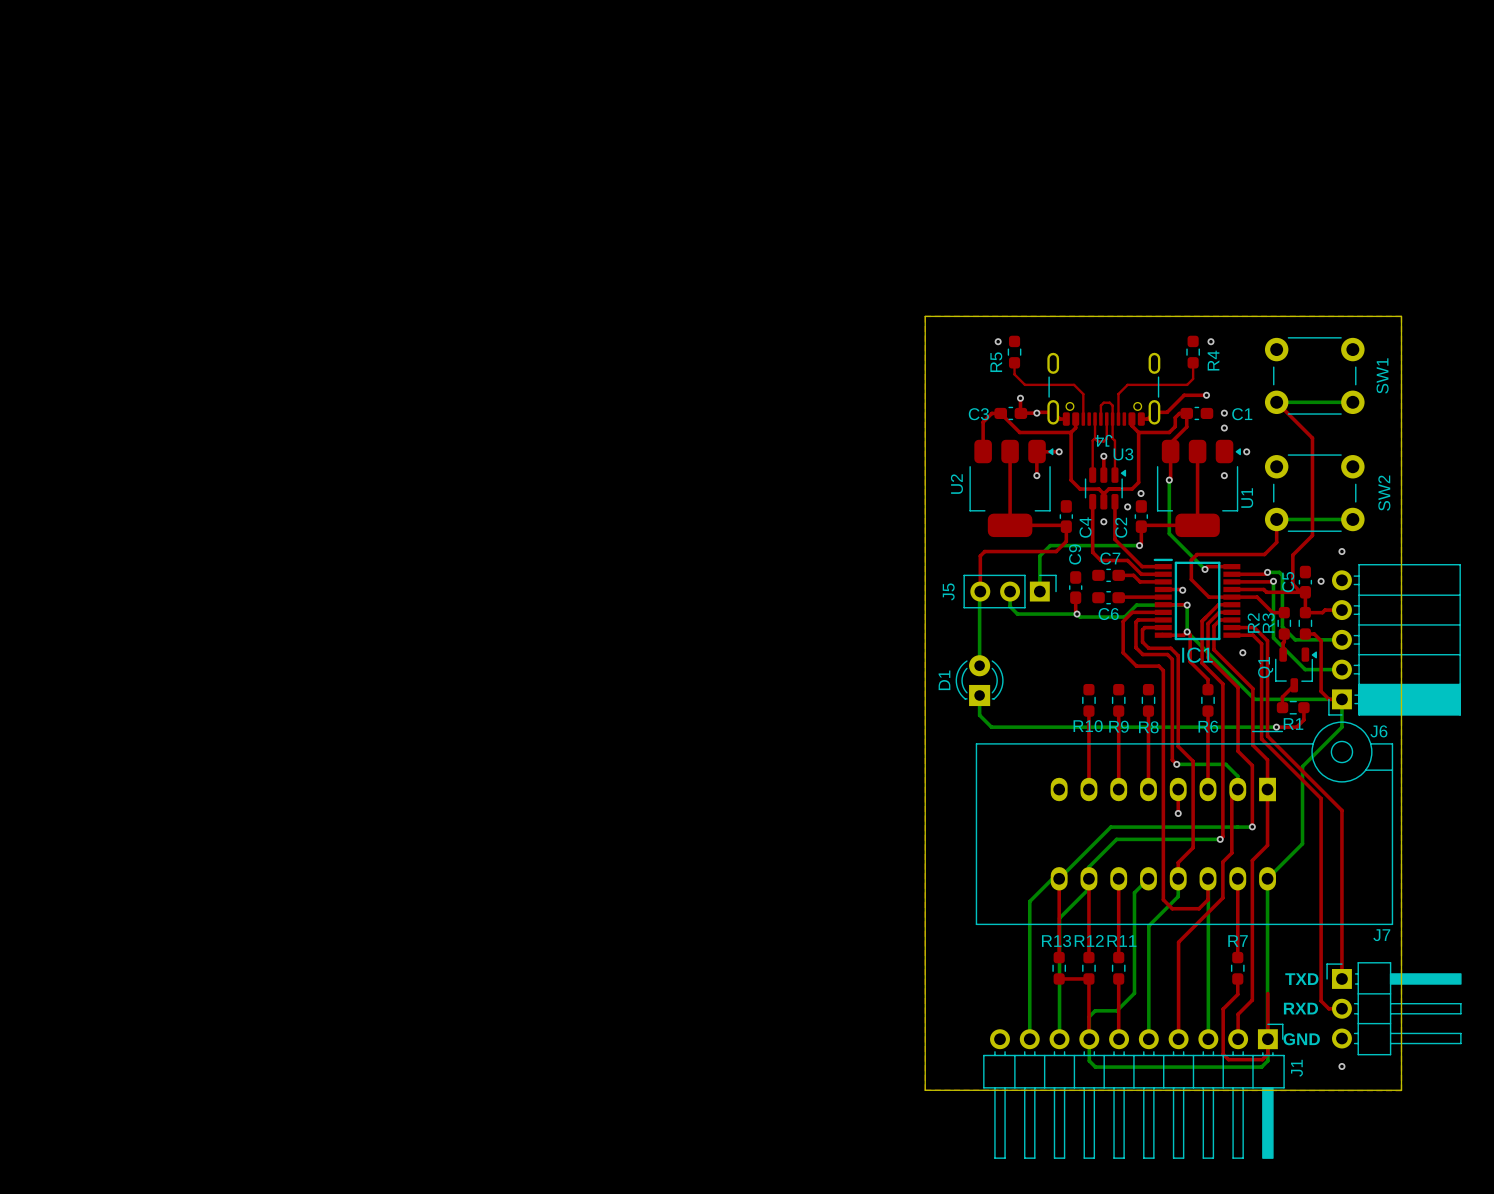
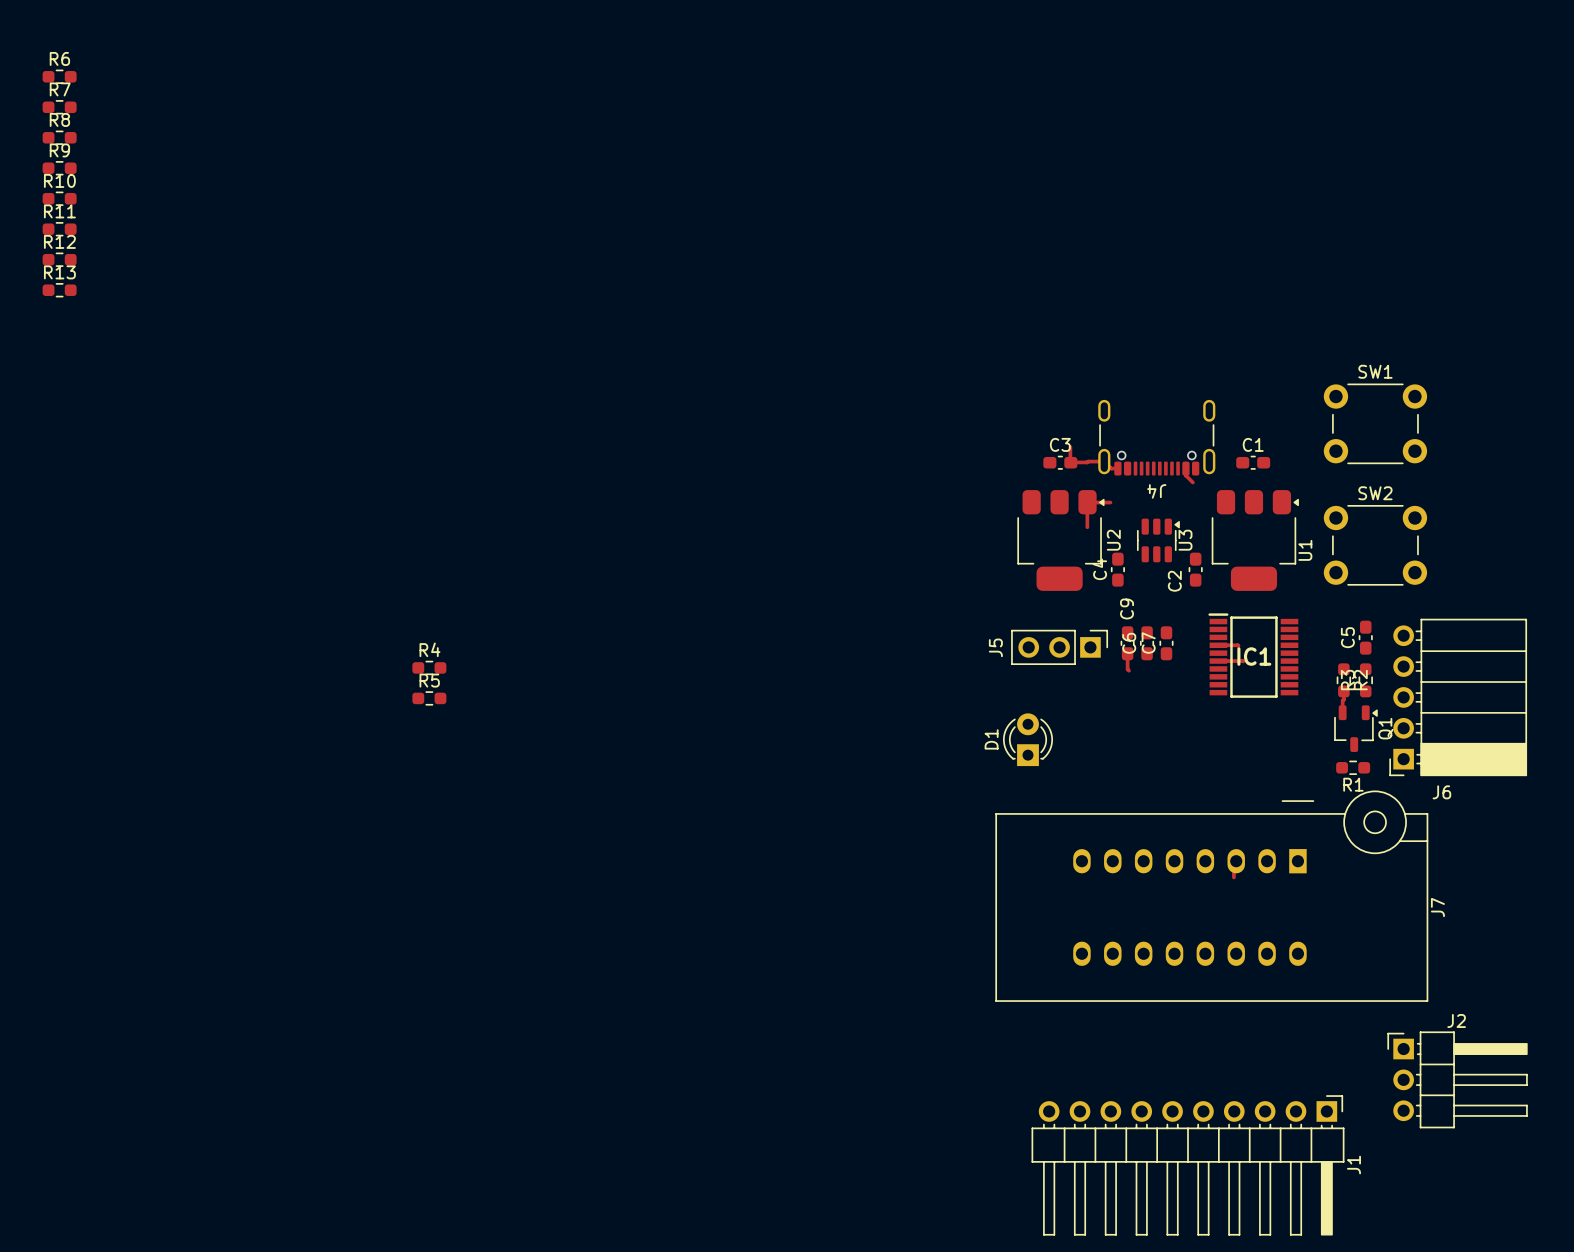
board edge: (925, 316) (1401, 316) (1401, 1090) (925, 1090) (925, 316) -> none
via: (998, 341) -> none
via: (1210, 341) -> none
R5 rotation: 0° (1014, 352) -> 90° clockwise (429, 698)
R5 position: (1014, 352) -> (429, 698)
R4 rotation: 0° (1193, 352) -> 90° clockwise (429, 667)
R4 position: (1193, 352) -> (429, 667)
R4 name position: R4 (1213, 360) -> R4 (429, 649)
top track: (1014, 362) (1014, 374) (1024, 384) (1074, 384) (1083, 394) (1083, 419) -> none
top track: (1193, 362) (1193, 378) (1187, 384) (1127, 384) (1118, 394) (1118, 419) -> none
SW1 name rotation: 0° (1382, 375) -> 90° clockwise (1375, 371)
SW1 name position: SW1 (1382, 375) -> SW1 (1375, 371)
top track: (1206, 395) (1184, 395) (1167, 412) (1154, 412) (1147, 419) (1141, 419) -> none
via: (1206, 395) -> none
via: (1020, 398) -> none
top track: (1276, 402) (1312, 438) (1312, 535) (1292, 555) (1292, 584) (1300, 592) -> none
bottom track: (1276, 402) (1352, 402) -> none
via: (1036, 413) -> none
via: (1224, 413) -> none
C3 name position: C3 (978, 414) -> C3 (1060, 444)
C1 name position: C1 (1242, 414) -> C1 (1253, 444)
top track: (1075, 419) (1075, 427) (1071, 432) -> none
top track: (1095, 419) (1095, 438) (1097, 441) (1103, 441) (1106, 438) (1106, 419) -> none
top track: (1100, 419) (1100, 405) (1103, 402) (1109, 402) (1112, 405) (1114, 475) -> none
via: (1224, 428) -> none
top track: (1071, 432) (1071, 480) (1080, 489) (1098, 489) (1103, 494) (1108, 489) (1132, 489) (1138, 482) (1138, 432) (1169, 432) (1175, 426) (1175, 417) (1179, 413) (1186, 413) (1186, 426) (1170, 443) (1169, 480) -> none
top track: (1071, 432) (1019, 432) (1000, 413) (991, 413) (983, 422) (983, 451) -> none
top track: (1095, 438) (1092, 440) (1092, 475) -> none
top track: (1010, 451) (1010, 525) (1065, 525) (1066, 541) (1056, 551) (984, 551) (980, 556) (980, 591) -> none
via: (1059, 451) -> none
top track: (1197, 451) (1197, 525) (1142, 525) (1139, 545) -> none
via: (1246, 451) -> none
U3 name rotation: 0° (1123, 454) -> 90° counterclockwise (1185, 540)
U3 name position: U3 (1123, 454) -> U3 (1185, 540)
top track: (1103, 456) (1103, 475) -> none
via: (1103, 456) -> none
via: (1036, 475) -> none
via: (1224, 475) -> none
bottom track: (1169, 480) (1169, 533) (1205, 569) -> none
via: (1169, 480) -> none
U2 name position: U2 (956, 484) -> U2 (1113, 540)
via: (1141, 493) -> none
SW2 name rotation: 0° (1384, 493) -> 90° clockwise (1375, 493)
SW2 name position: SW2 (1384, 493) -> SW2 (1375, 493)
top track: (1092, 501) (1092, 552) (1100, 560) (1127, 560) (1141, 574) (1163, 574) -> none
top track: (1114, 501) (1114, 539) (1142, 566) (1163, 566) -> none
via: (1127, 506) -> none
top track: (1276, 519) (1276, 542) (1264, 554) (1196, 554) (1191, 560) (1191, 579) (1208, 597) (1257, 597) (1272, 612) (1284, 612) -> none
bottom track: (1276, 519) (1352, 519) -> none
via: (1103, 521) -> none
C4 name position: C4 (1085, 527) -> C4 (1099, 569)
bottom track: (1139, 545) (1050, 545) (1039, 556) (1039, 591) -> none
via: (1139, 545) -> none
via: (1341, 551) -> none
C7 name position: C7 (1110, 558) -> C7 (1148, 643)
top track: (1231, 566) (1207, 566) (1205, 569) -> none
via: (1205, 569) -> none
top track: (1267, 572) (1265, 574) (1231, 574) -> none
bottom track: (1267, 572) (1279, 572) (1282, 575) (1282, 626) (1295, 639) (1341, 639) -> none
via: (1267, 572) -> none
C7 rotation: 0° (1108, 575) -> 90° clockwise (1166, 643)
top track: (1118, 575) (1133, 575) (1140, 581) (1163, 581) -> none
top track: (1273, 581) (1231, 581) -> none
bottom track: (1273, 581) (1273, 637) (1305, 669) (1341, 669) -> none
via: (1273, 581) -> none
via: (1321, 581) -> none
top track: (1231, 589) (1305, 592) (1305, 612) (1341, 610) -> none
via: (1182, 590) -> none
bottom track: (980, 591) (979, 665) -> none
bottom track: (1010, 591) (1010, 606) (1017, 614) (1077, 614) (1080, 617) (1124, 617) (1136, 605) (1187, 605) -> none
C6 rotation: 0° (1108, 597) -> 90° clockwise (1147, 643)
top track: (1163, 597) (1118, 597) -> none
top track: (1231, 604) (1218, 604) (1202, 621) (1202, 663) (1222, 684) (1222, 836) (1220, 839) -> none
bottom track: (1187, 605) (1187, 631) (1254, 699) (1341, 699) (1341, 727) (1302, 766) (1302, 843) (1267, 878) (1267, 1060) (1261, 1067) (1095, 1067) (1089, 1060) (1089, 1016) (1095, 1010) (1116, 1010) (1134, 993) (1134, 892) (1148, 878) -> none
via: (1187, 605) -> none
top track: (1163, 612) (1132, 612) (1123, 621) (1123, 652) (1136, 666) (1158, 666) (1163, 670) (1163, 899) (1172, 908) (1199, 908) (1208, 899) (1208, 878) -> none
top track: (1231, 612) (1219, 612) (1208, 623) (1208, 657) (1238, 687) (1238, 751) (1252, 765) (1252, 826) -> none
via: (1077, 614) -> none
top track: (1163, 619) (1138, 619) (1135, 622) (1135, 647) (1142, 654) (1167, 654) (1172, 659) (1172, 759) (1176, 764) -> none
top track: (1231, 619) (1220, 619) (1213, 626) (1213, 649) (1252, 688) (1252, 745) (1267, 759) (1267, 845) (1252, 860) (1252, 1000) (1238, 1014) (1238, 1039) -> none
R2 name position: R2 (1253, 623) -> R2 (1360, 680)
R3 name position: R3 (1268, 623) -> R3 (1347, 680)
top track: (1163, 627) (1144, 627) (1142, 629) (1142, 642) (1148, 648) (1170, 648) (1178, 655) (1178, 746) (1193, 761) (1193, 847) (1178, 862) (1178, 878) -> none
top track: (1231, 627) (1254, 627) (1267, 640) (1267, 736) (1341, 810) (1341, 978) -> none
via: (1187, 631) -> none
top track: (1162, 634) (1183, 635) (1187, 631) (1190, 634) (1190, 661) (1208, 679) (1208, 689) -> none
top track: (1305, 634) (1314, 634) (1321, 640) (1321, 691) (1329, 699) (1341, 699) -> none
top track: (1231, 635) (1252, 635) (1261, 643) (1261, 739) (1321, 798) (1321, 1001) (1328, 1008) (1341, 1008) -> none
via: (1242, 652) -> none
IC1 name position: IC1 (1197, 655) -> IC1 (1254, 656)
Q1 name position: Q1 (1265, 667) -> Q1 (1385, 728)
top track: (1294, 685) (1282, 697) (1282, 707) -> none
bottom track: (979, 695) (979, 715) (991, 727) (1276, 727) -> none
R10 rotation: 0° (1088, 700) -> 90° clockwise (59, 198)
R10 position: (1088, 700) -> (59, 198)
R9 rotation: 0° (1118, 700) -> 90° clockwise (59, 168)
R9 position: (1118, 700) -> (59, 168)
R8 rotation: 0° (1148, 700) -> 90° clockwise (59, 137)
R8 position: (1148, 700) -> (59, 137)
R6 rotation: 0° (1208, 700) -> 90° clockwise (59, 76)
R6 position: (1208, 700) -> (59, 76)
top track: (1303, 707) (1303, 719) (1296, 727) (1276, 727) -> none
top track: (1088, 711) (1088, 789) -> none
top track: (1118, 711) (1118, 789) -> none
top track: (1148, 711) (1148, 789) -> none
top track: (1208, 711) (1208, 789) -> none
R10 name position: R10 (1088, 726) -> R10 (59, 180)
R9 name position: R9 (1119, 726) -> R9 (59, 150)
R6 name position: R6 (1208, 726) -> R6 (59, 58)
R8 name position: R8 (1148, 727) -> R8 (59, 119)
via: (1276, 727) -> none
bottom track: (1176, 764) (1225, 764) (1237, 776) (1237, 789) -> none
via: (1176, 764) -> none
top track: (1237, 789) (1231, 795) (1231, 853) (1222, 862) (1222, 897) (1178, 942) (1178, 1039) -> none
via: (1178, 813) -> none
J7 position: (1184, 823) -> (1211, 896)
bottom track: (1252, 826) (1110, 827) (1059, 878) (1052, 878) (1029, 901) (1029, 1039) -> none
via: (1252, 826) -> none
bottom track: (1220, 839) (1116, 839) (1088, 867) (1088, 888) (1059, 918) (1059, 1039) -> none
via: (1220, 839) -> none
top track: (1059, 878) (1059, 957) -> none
top track: (1088, 878) (1088, 957) -> none
top track: (1118, 878) (1118, 957) -> none
bottom track: (1178, 878) (1178, 896) (1148, 925) (1148, 1039) -> none
bottom track: (1208, 878) (1208, 1039) -> none
top track: (1237, 878) (1237, 957) -> none
J7 name rotation: 0° (1381, 935) -> 90° counterclockwise (1437, 907)
J7 name position: J7 (1381, 935) -> J7 (1437, 907)
J2 name: none -> J2 (1456, 1020)
R13 rotation: 0° (1059, 968) -> 90° clockwise (59, 290)
R13 position: (1059, 968) -> (59, 290)
R12 rotation: 0° (1088, 968) -> 90° clockwise (59, 259)
R12 position: (1088, 968) -> (59, 259)
R11 rotation: 0° (1118, 968) -> 90° clockwise (59, 229)
R11 position: (1118, 968) -> (59, 229)
R7 rotation: 0° (1237, 968) -> 90° clockwise (59, 107)
R7 position: (1237, 968) -> (59, 107)
top track: (1059, 978) (1088, 978) (1089, 1039) -> none
top track: (1118, 978) (1119, 1039) -> none
top track: (1237, 978) (1237, 994) (1223, 1009) (1223, 1054) (1228, 1059) (1262, 1059) (1267, 1054) (1267, 993) -> none
text: TXD (1301, 979) -> none
text: RXD (1300, 1008) -> none
text: GND (1301, 1039) -> none
via: (1341, 1066) -> none
J1 name position: J1 (1296, 1068) -> J1 (1353, 1165)

